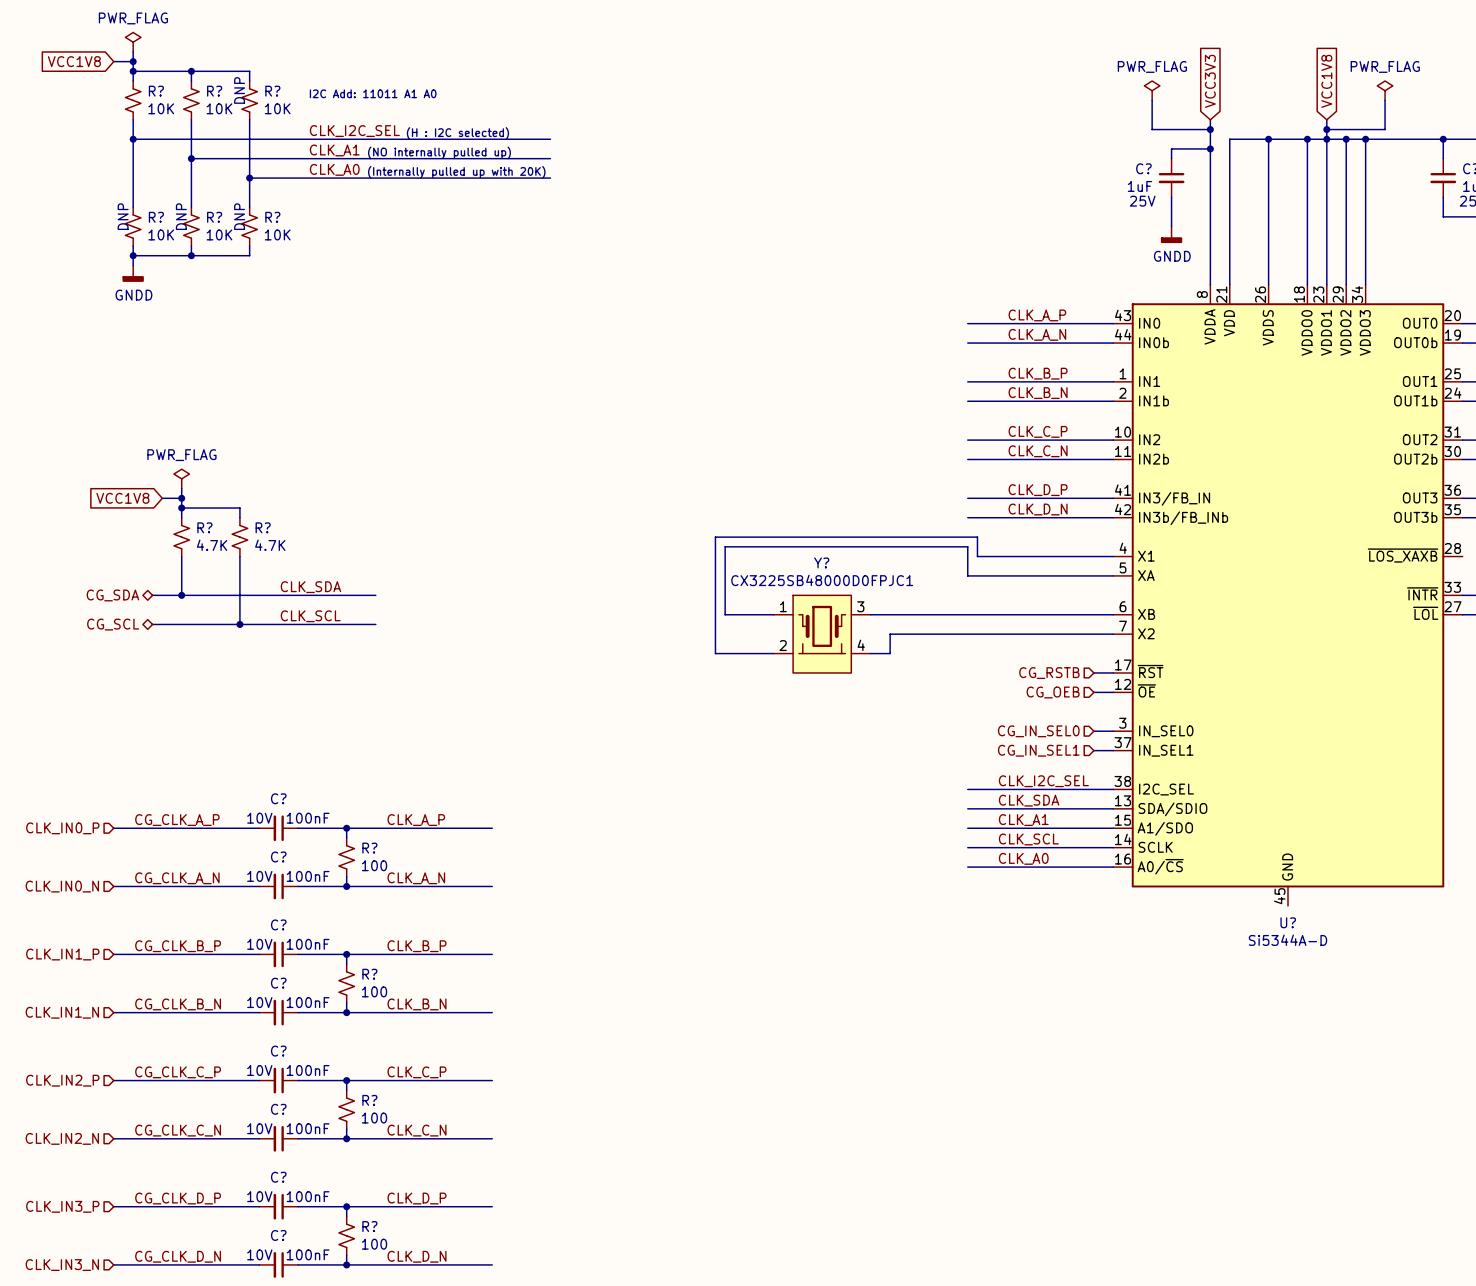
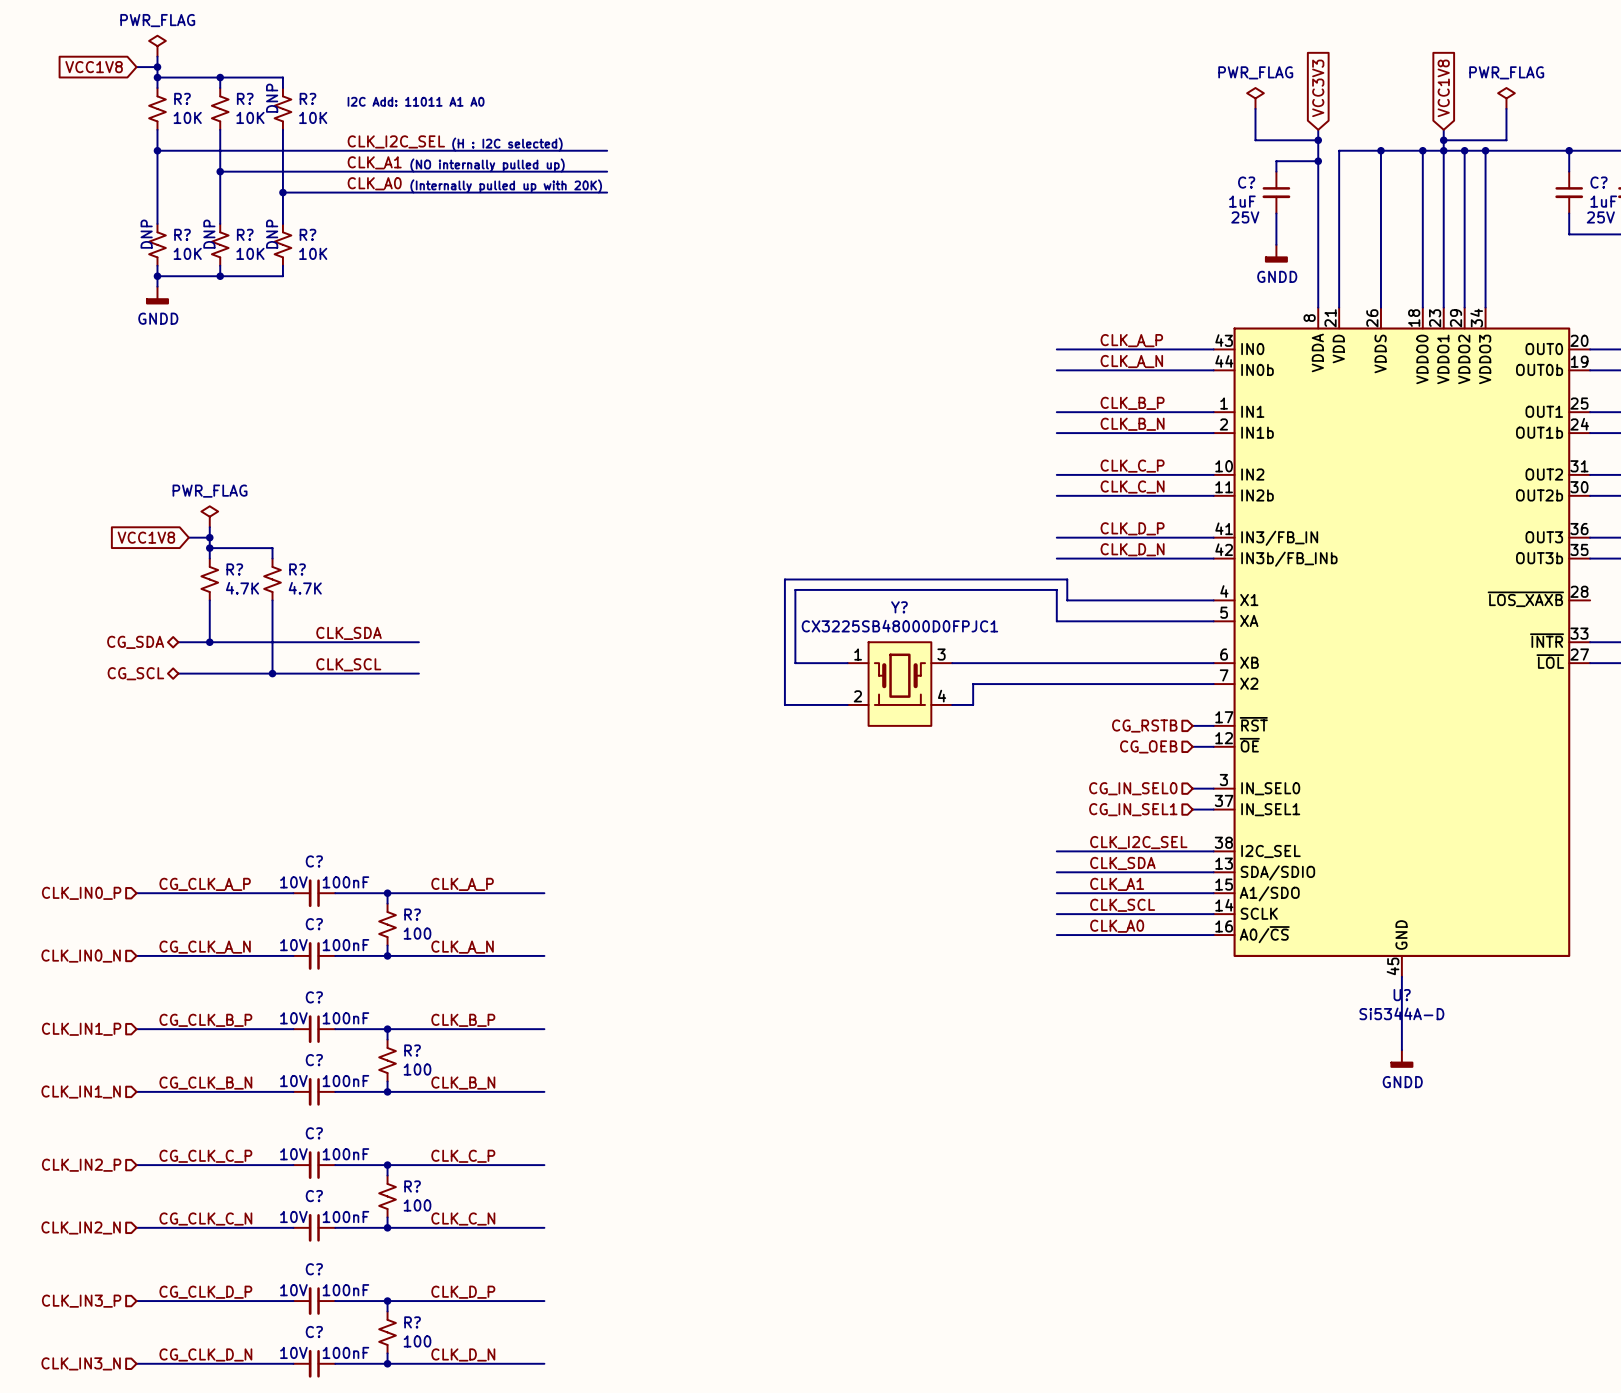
wire: none -> (1401, 976) (1401, 1050)
power symbol: none -> GNDD (1401, 1058)

